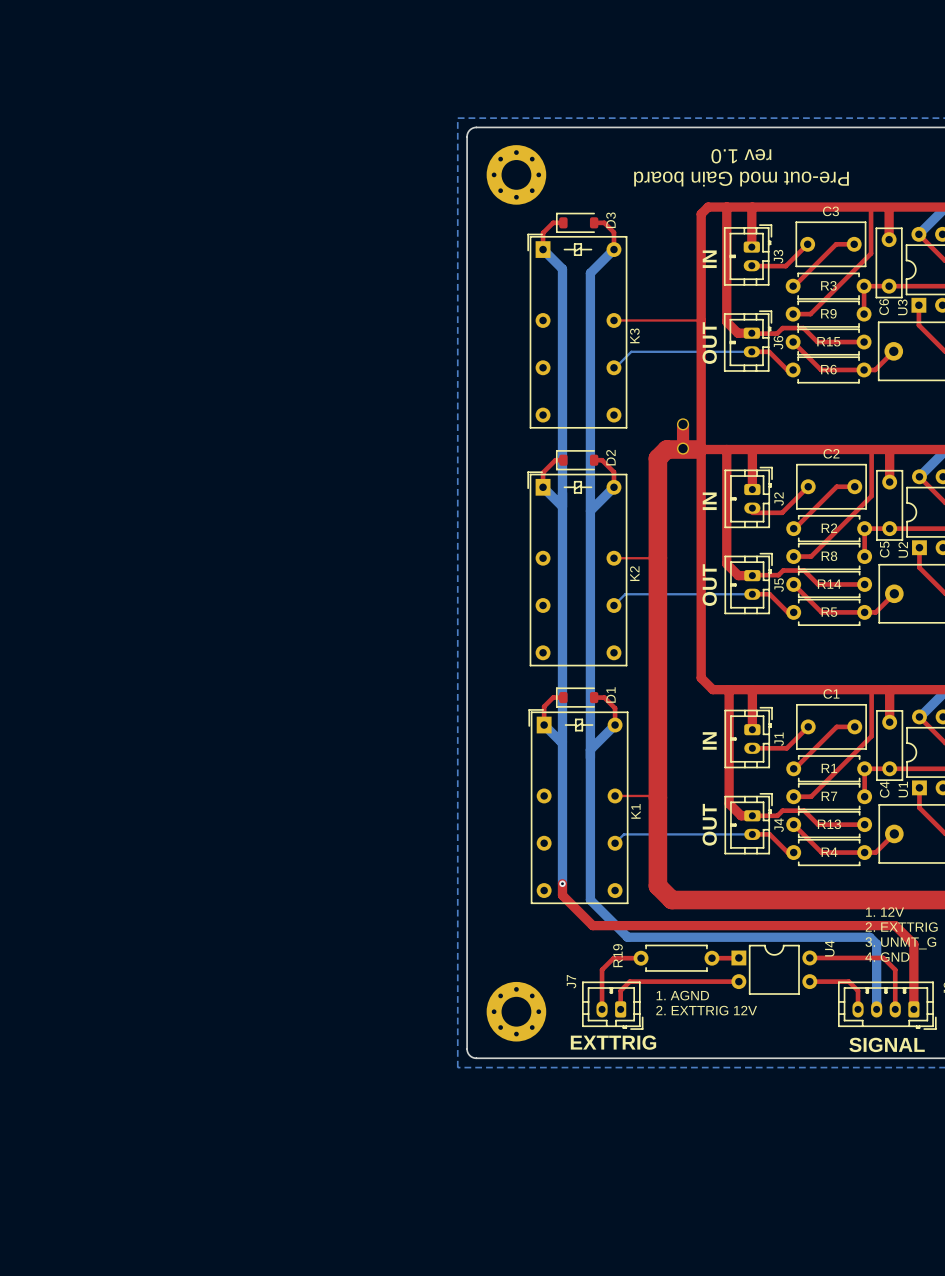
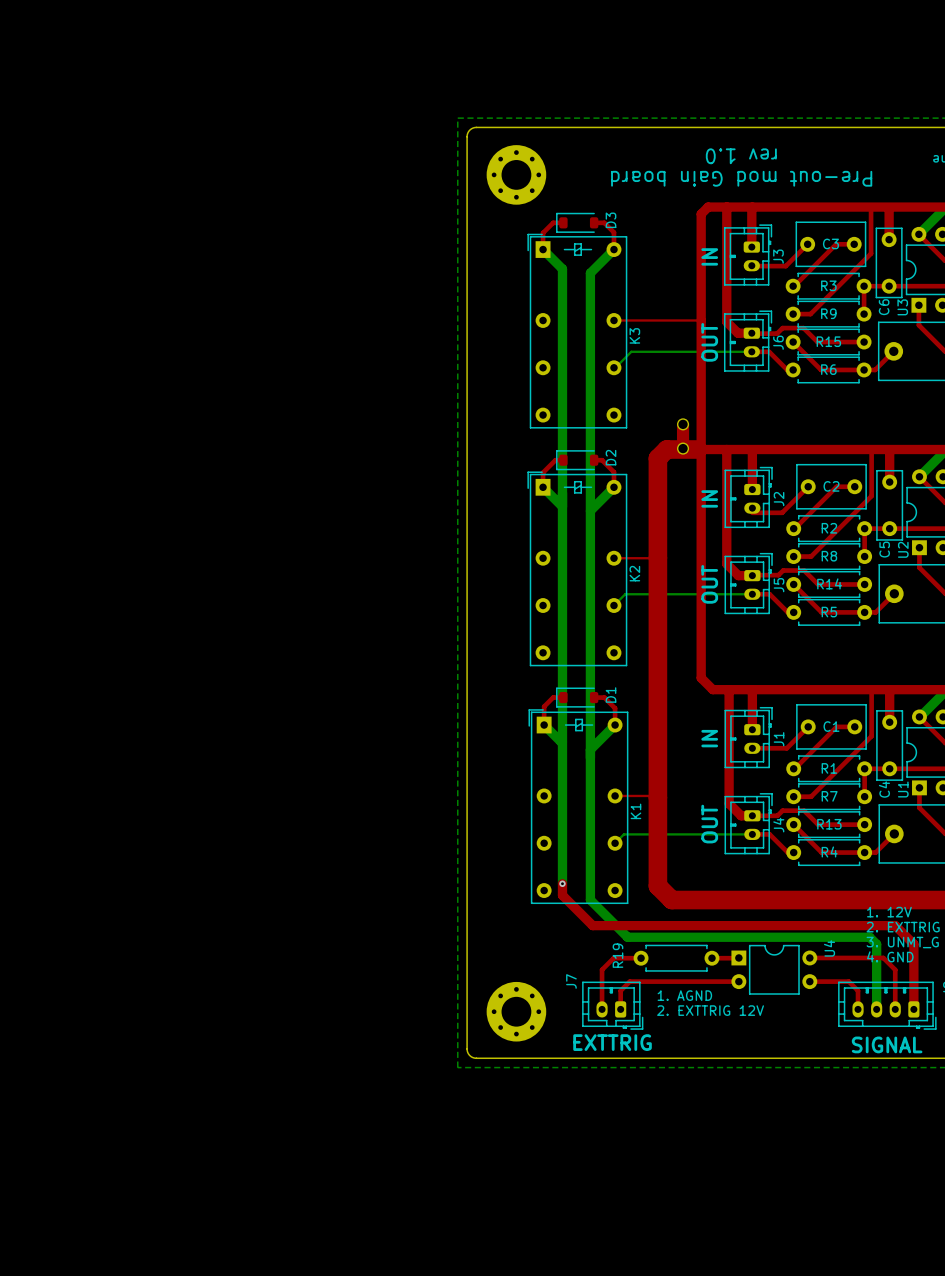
C3 name position: C3 (830, 211) -> C3 (830, 243)
C2 name position: C2 (831, 453) -> C2 (831, 486)
C1 name position: C1 (831, 693) -> C1 (831, 726)

